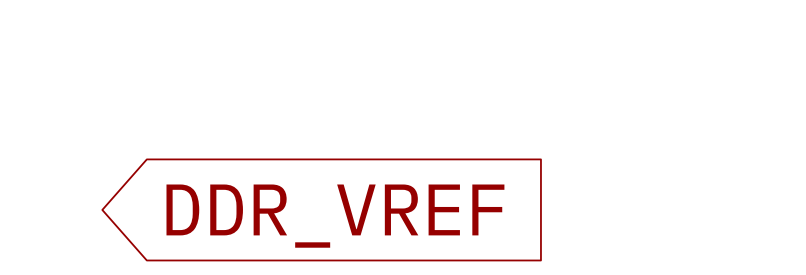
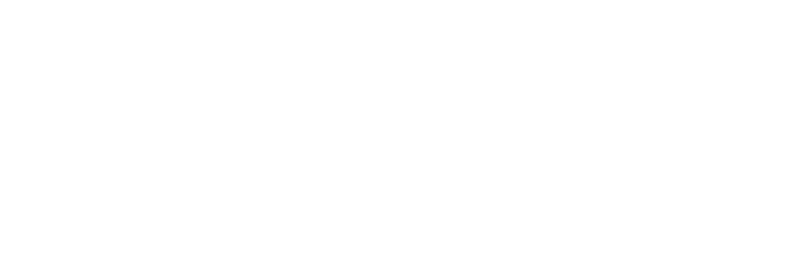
global label: DDR_VREF (335, 216) -> none

